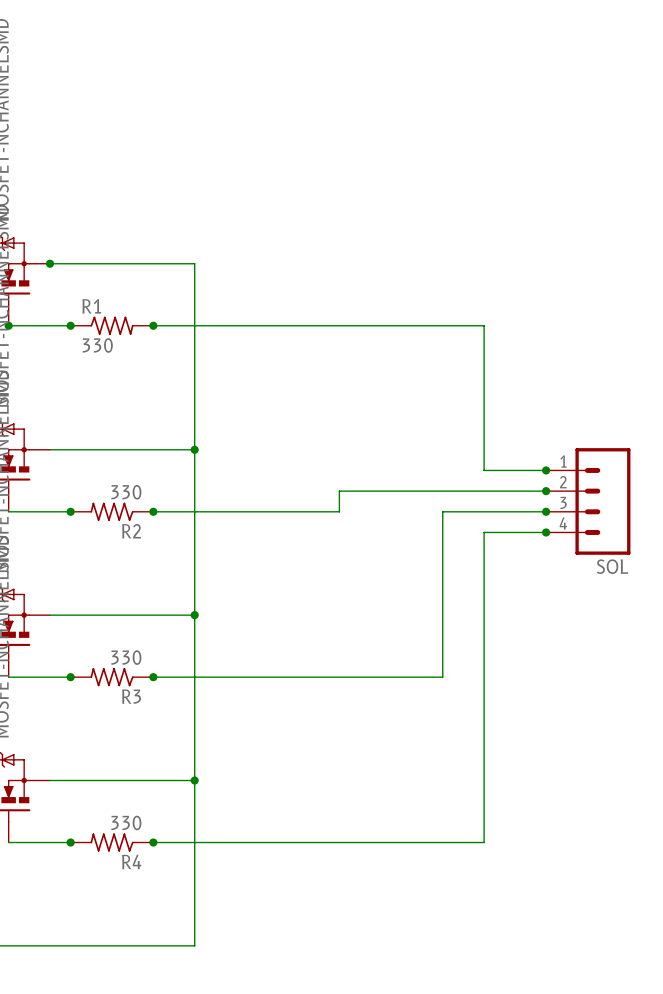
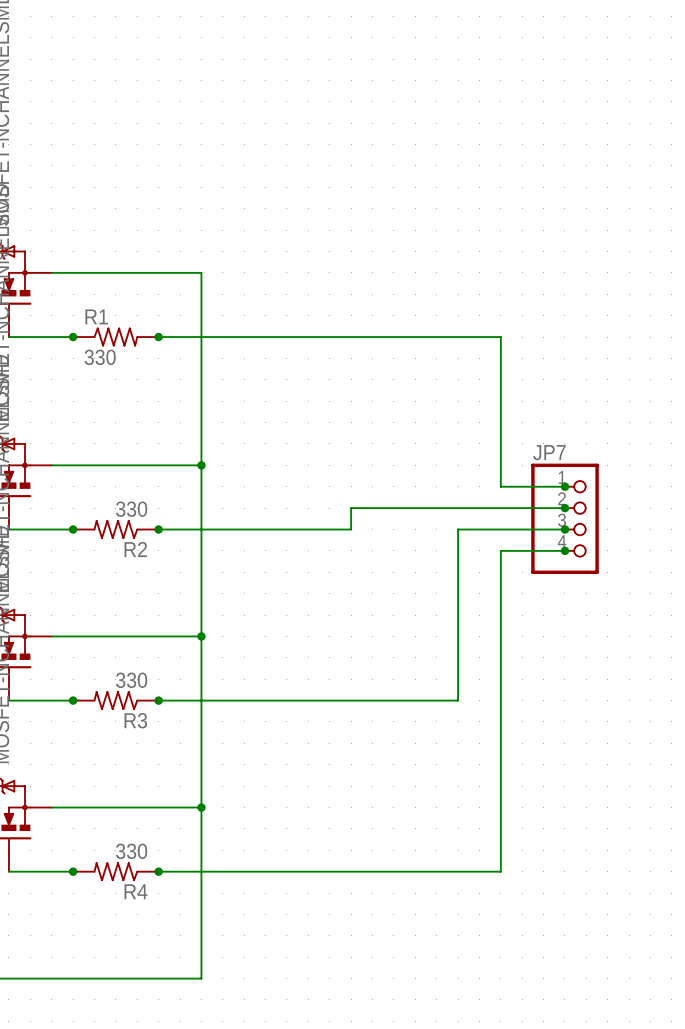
junction: (50, 263) -> none
junction: (8, 325) -> none
JP7: none -> (564, 518)
SOL: (588, 501) -> none

